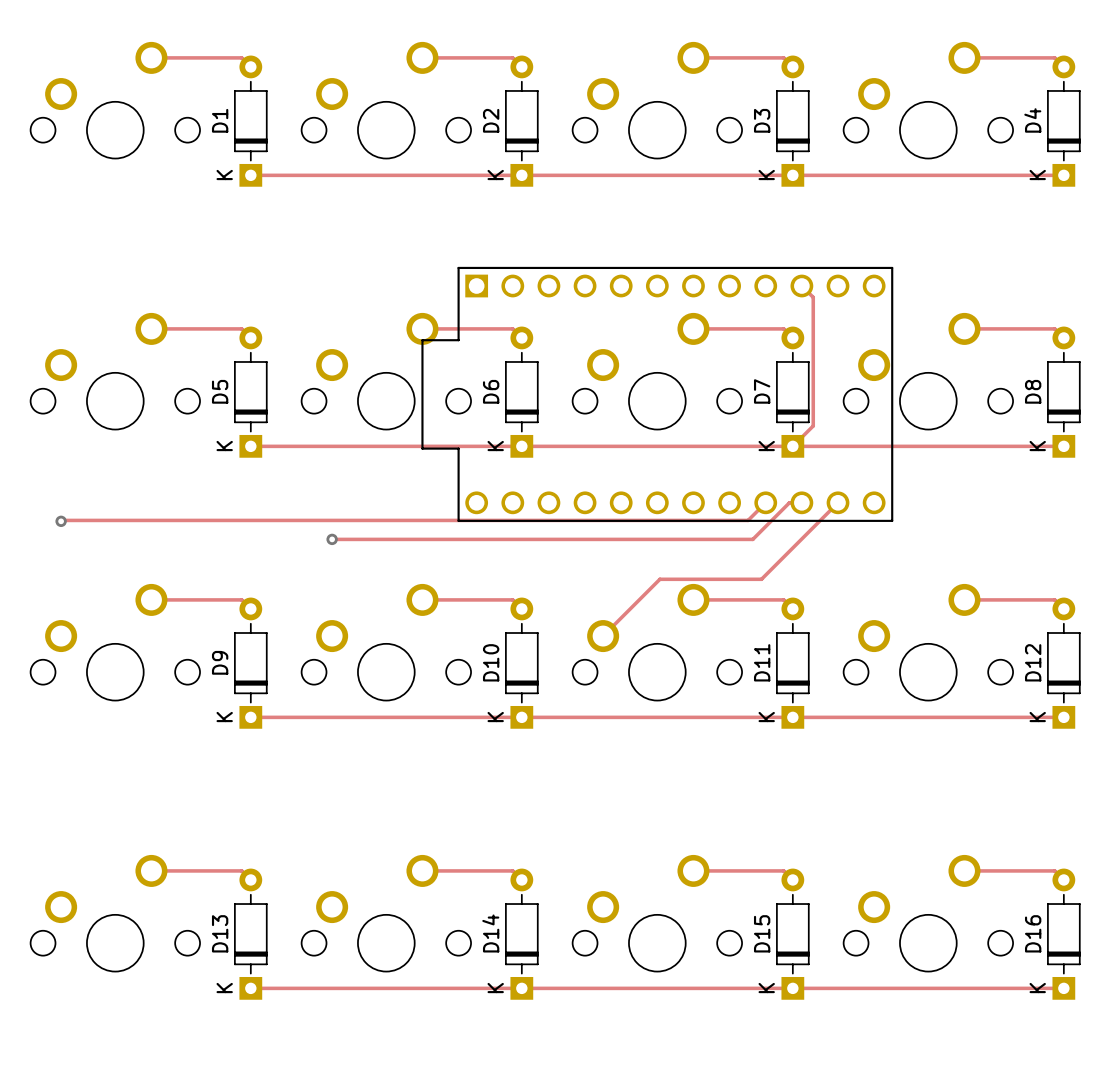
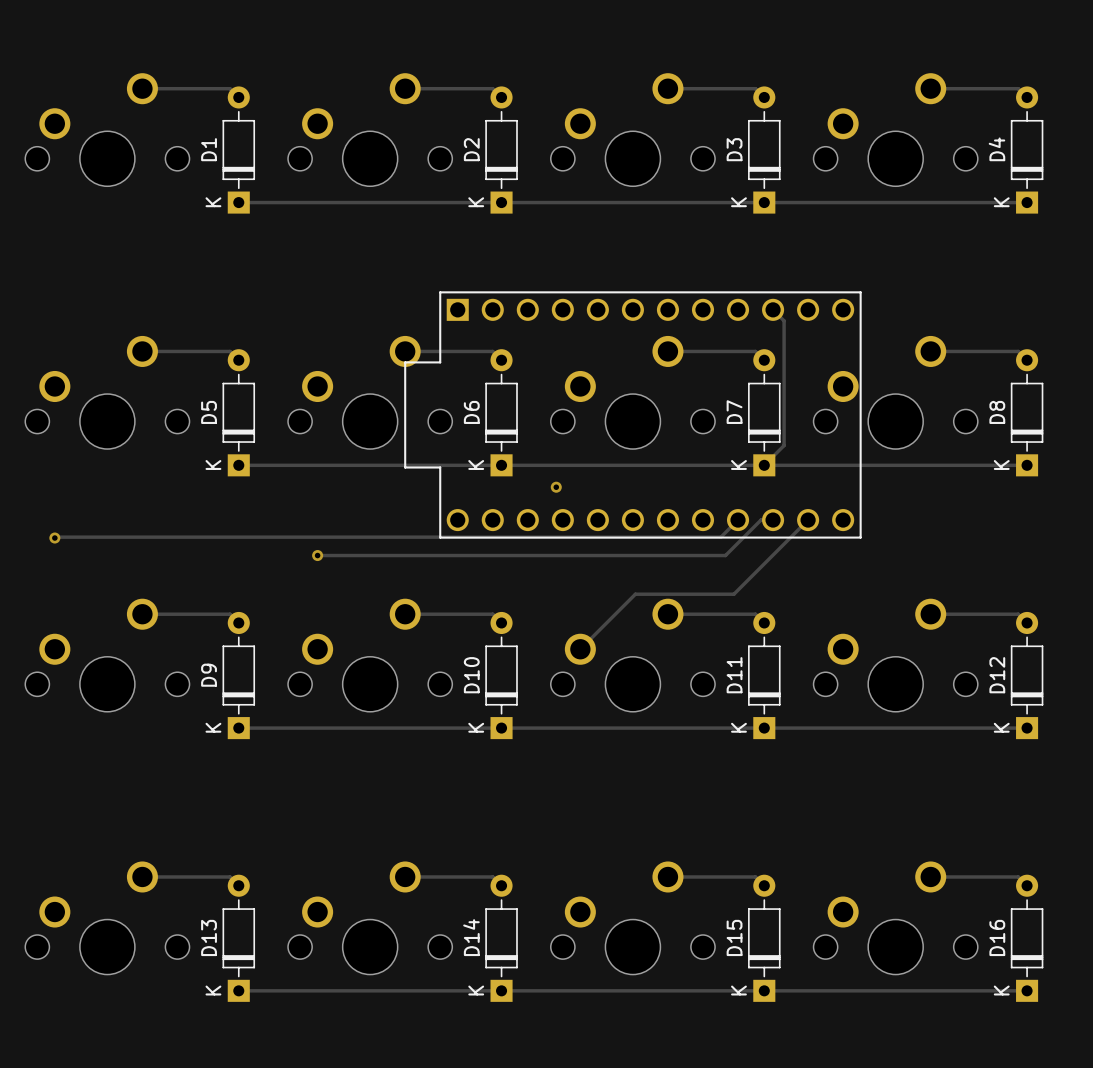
via: none -> (556, 487)

